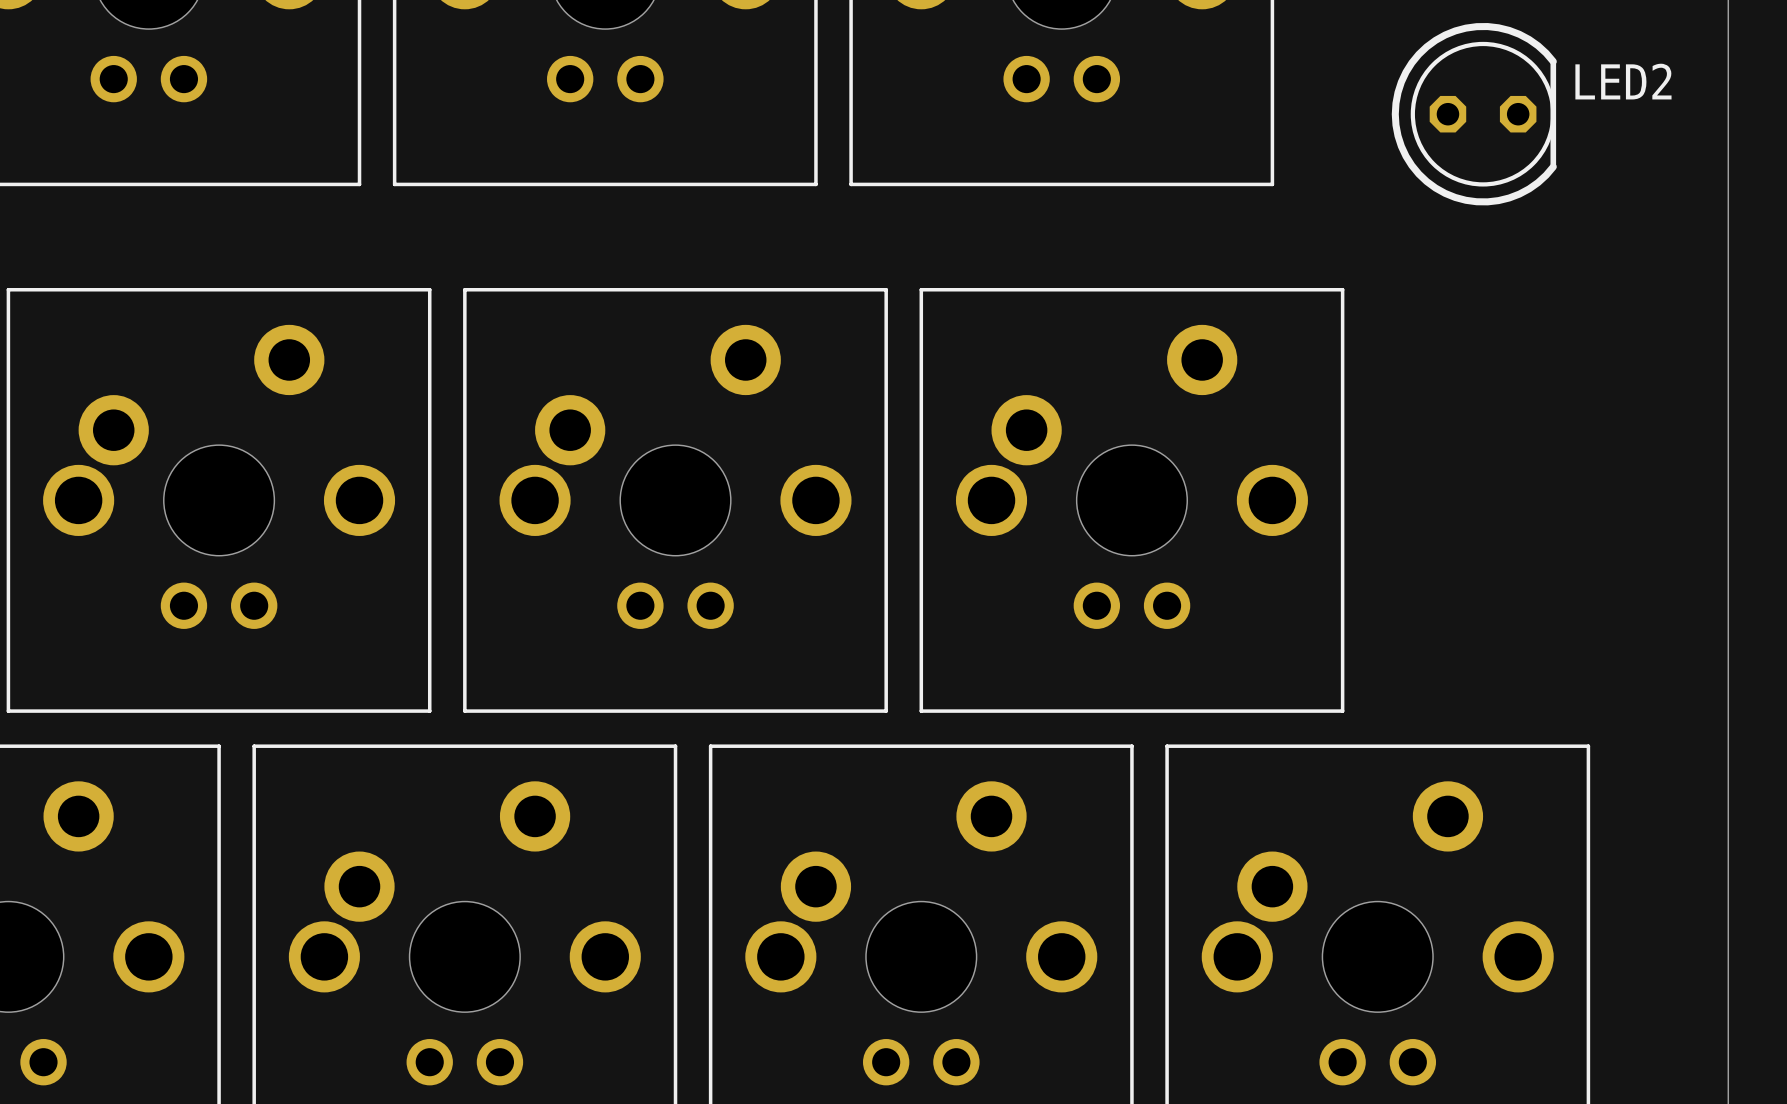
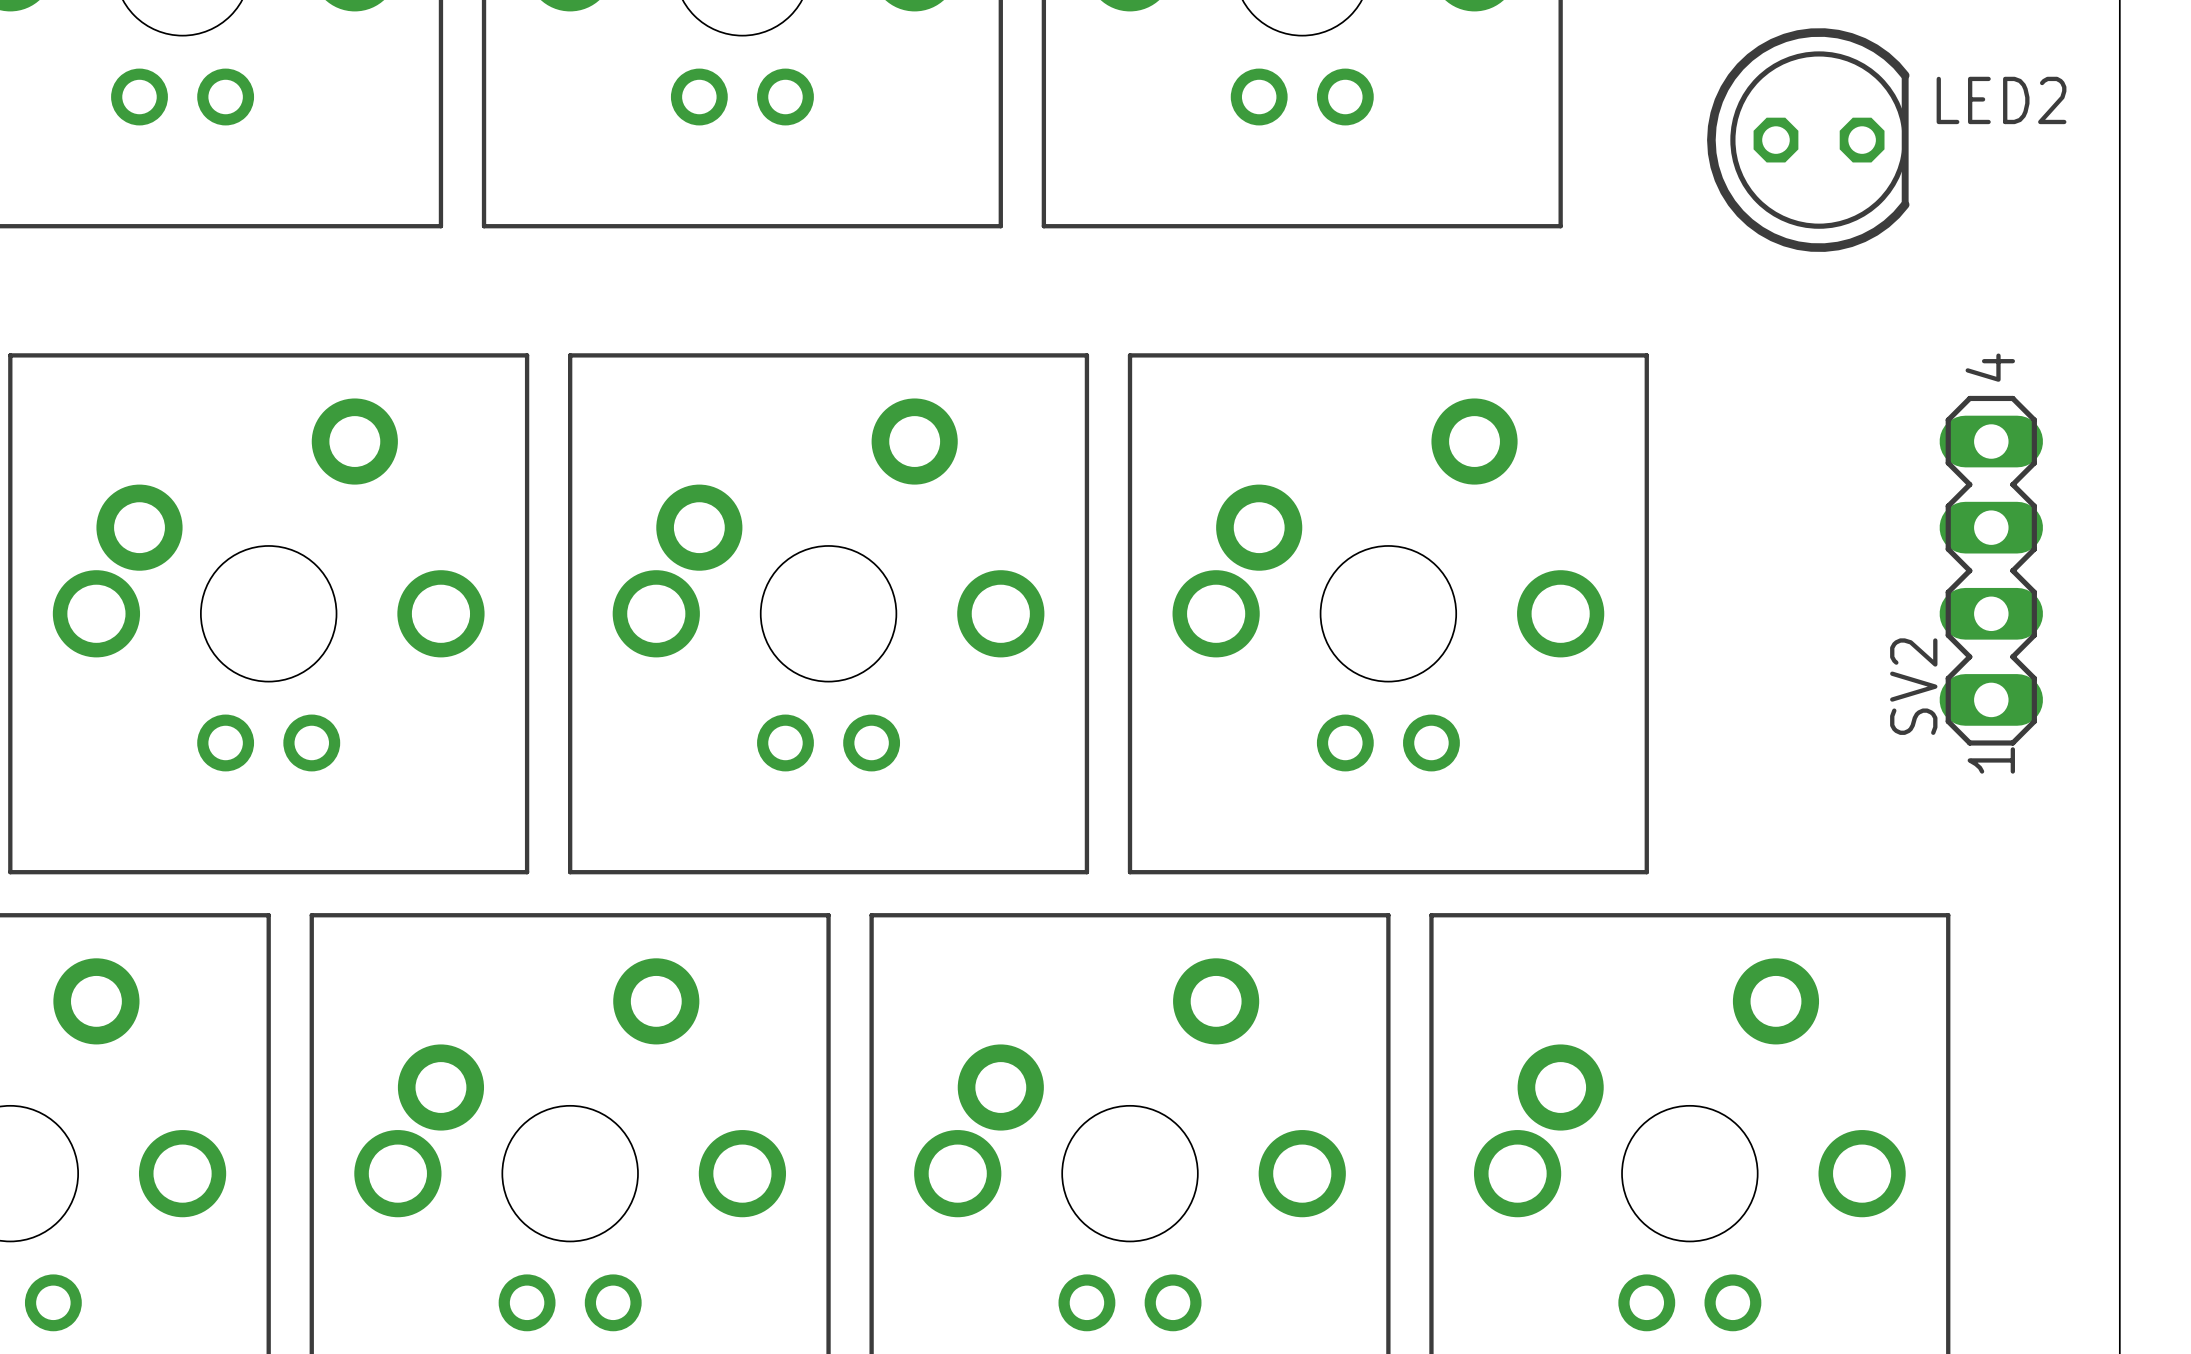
SV2: none -> (1991, 570)

